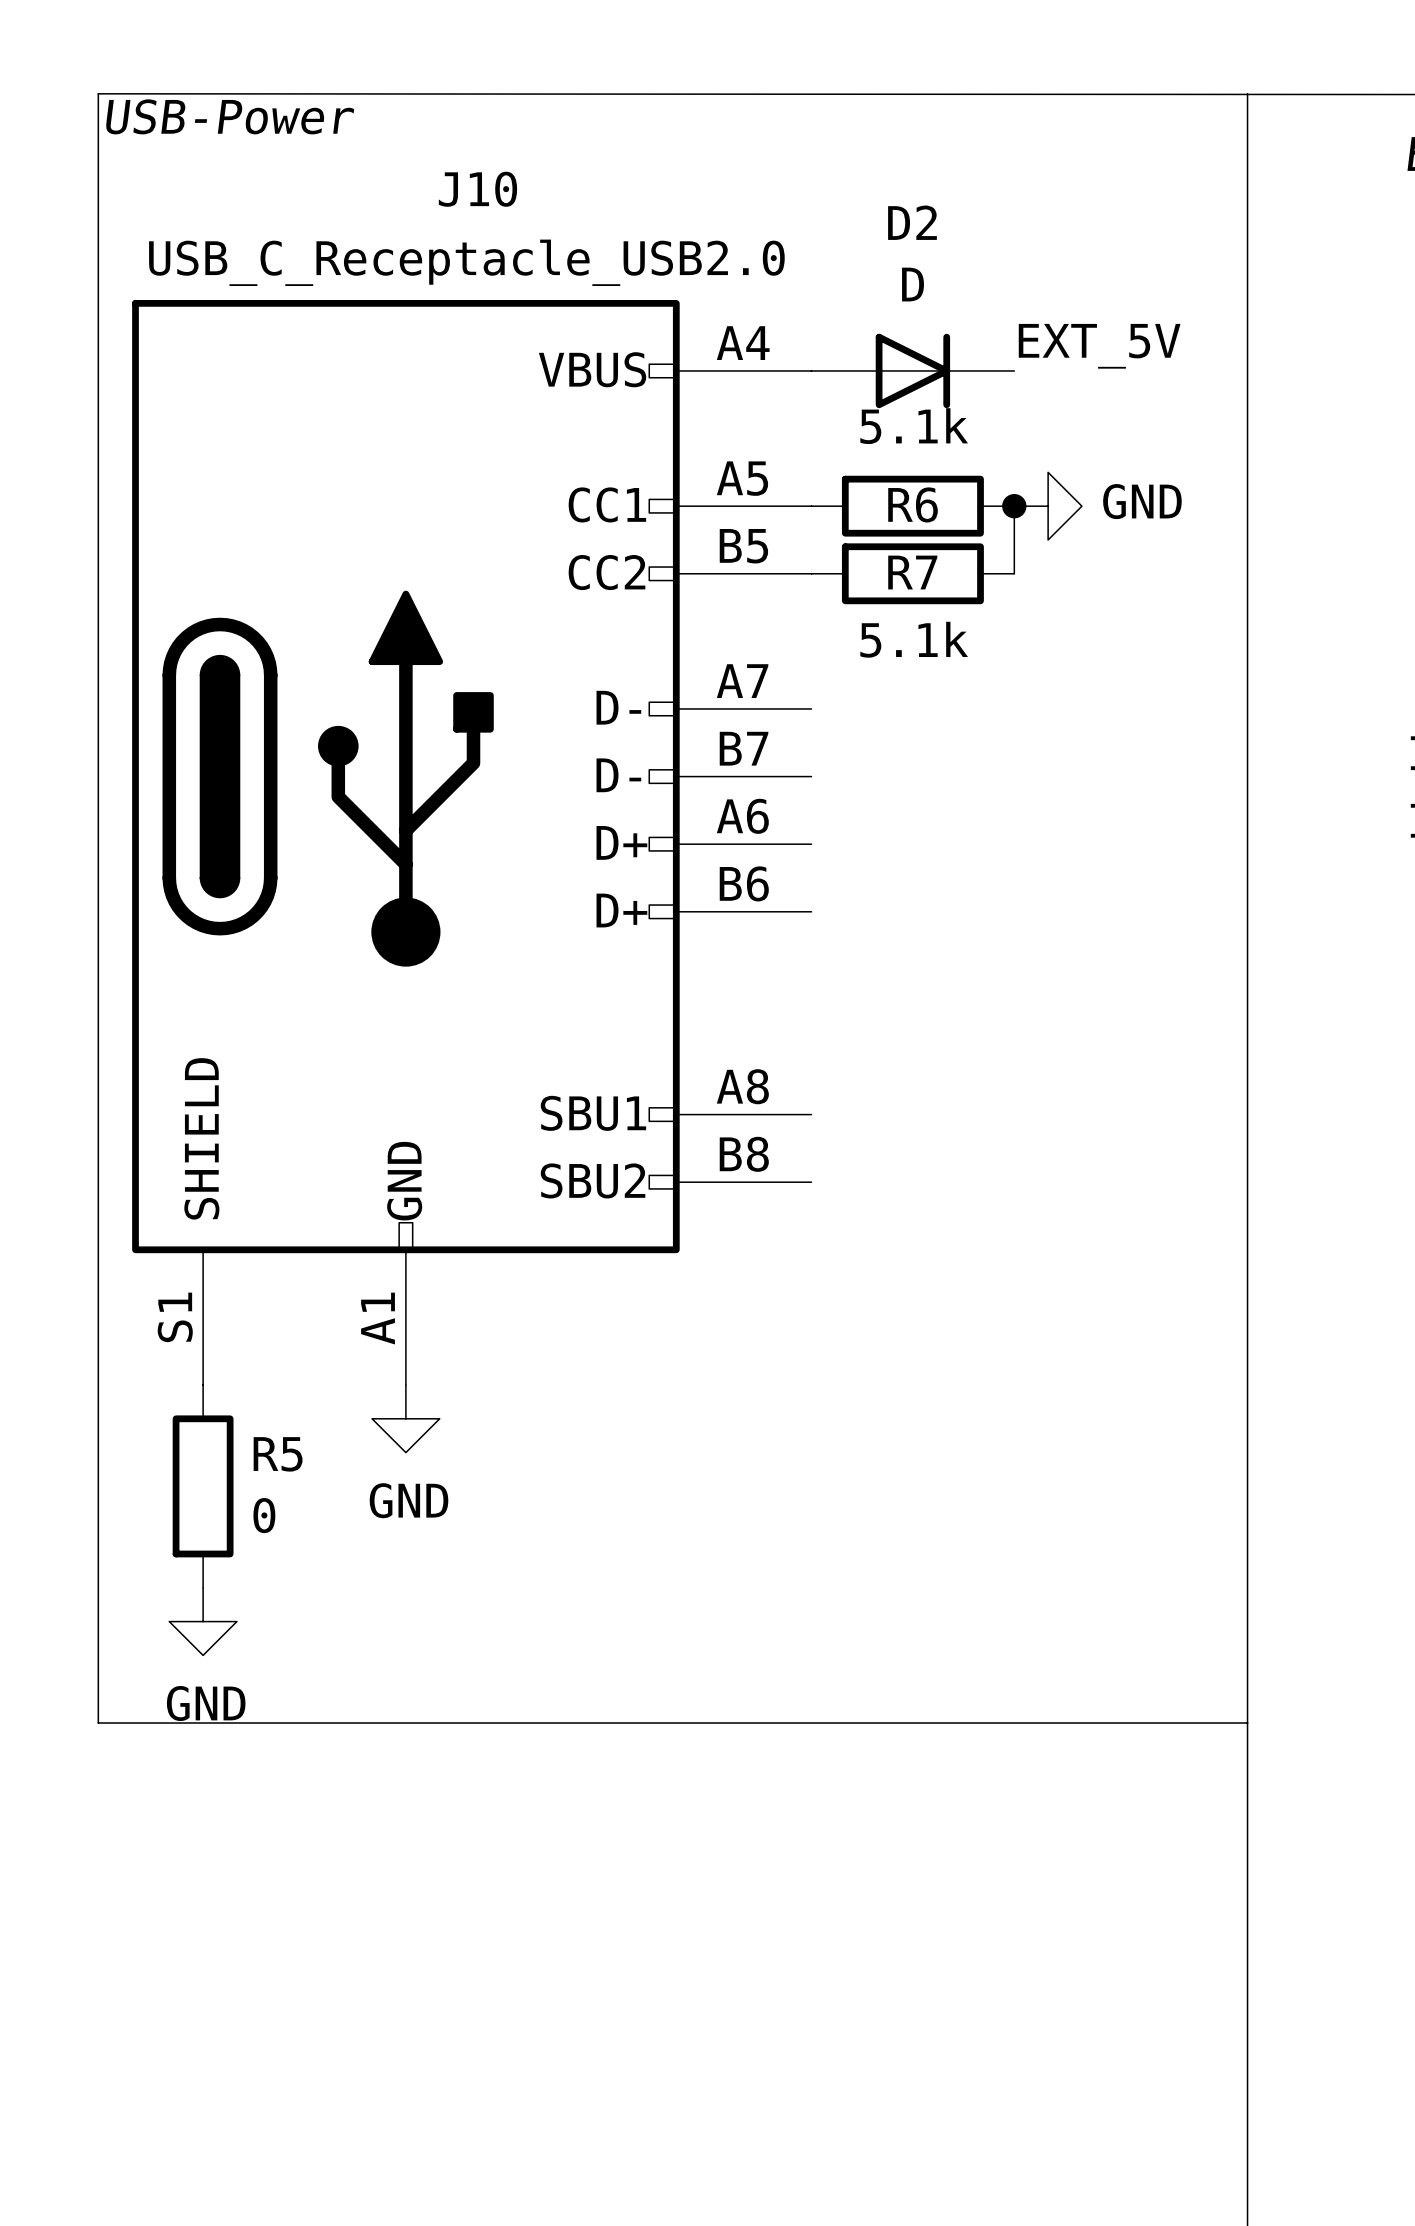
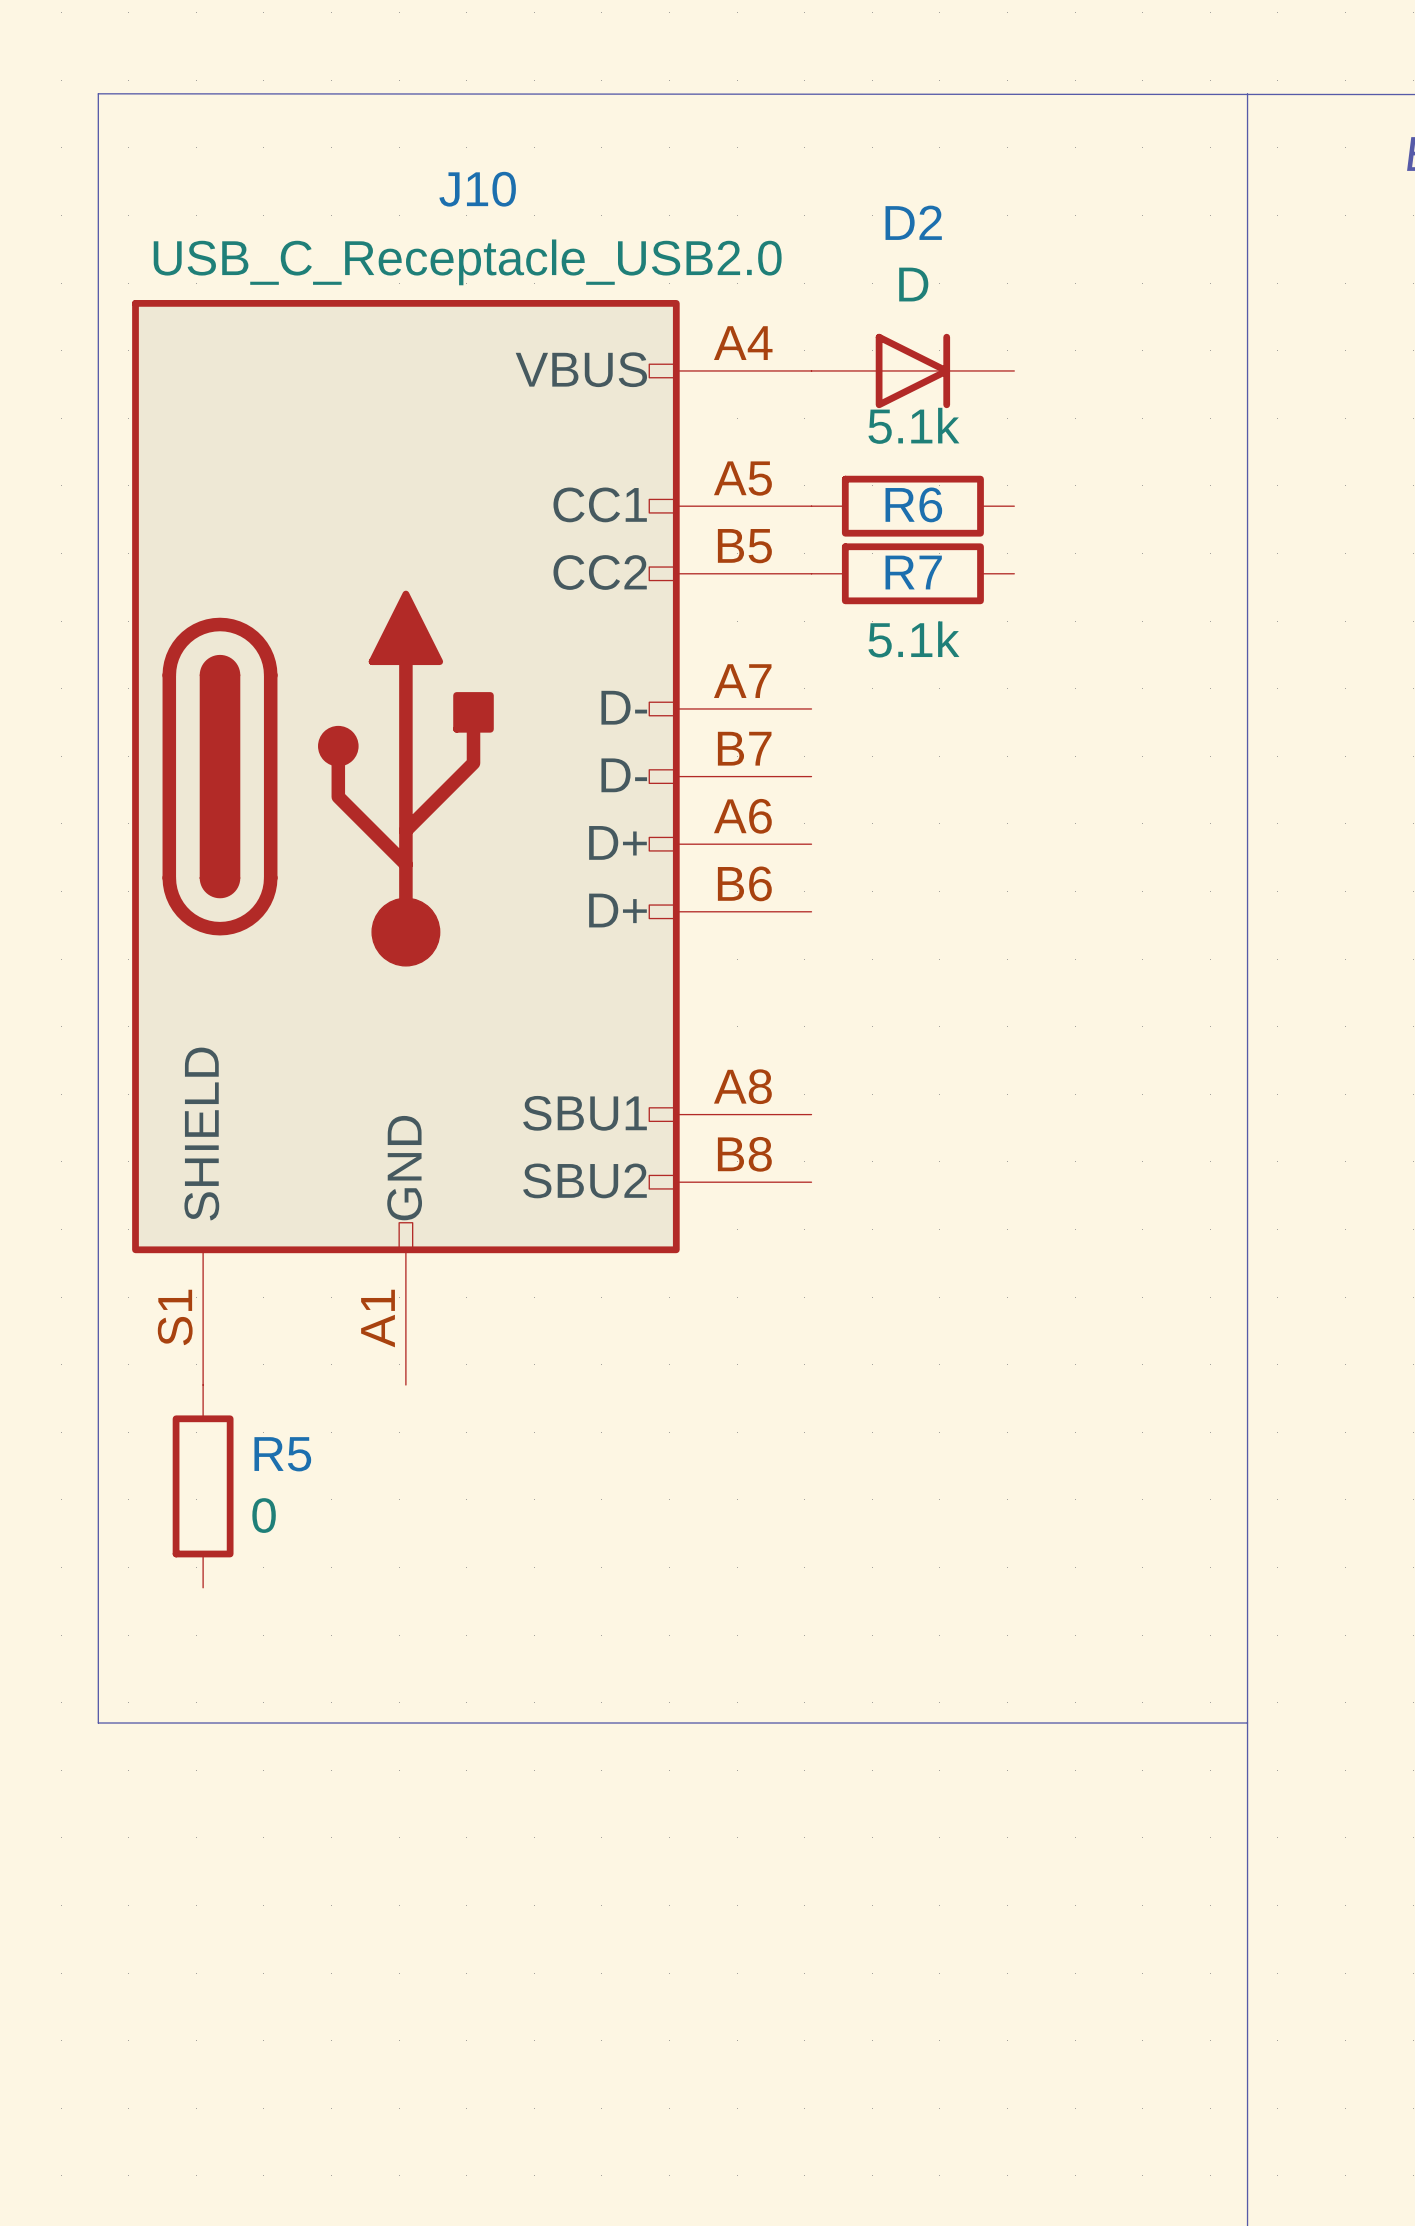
text: USB-Power (230, 116) -> none
label: EXT_5V (1099, 346) -> none
wire: (1014, 506) (1014, 573) -> none
junction: (1014, 506) -> none
power symbol: GND (1048, 506) -> none
power symbol: GND (405, 1418) -> none
power symbol: GND (203, 1621) -> none

